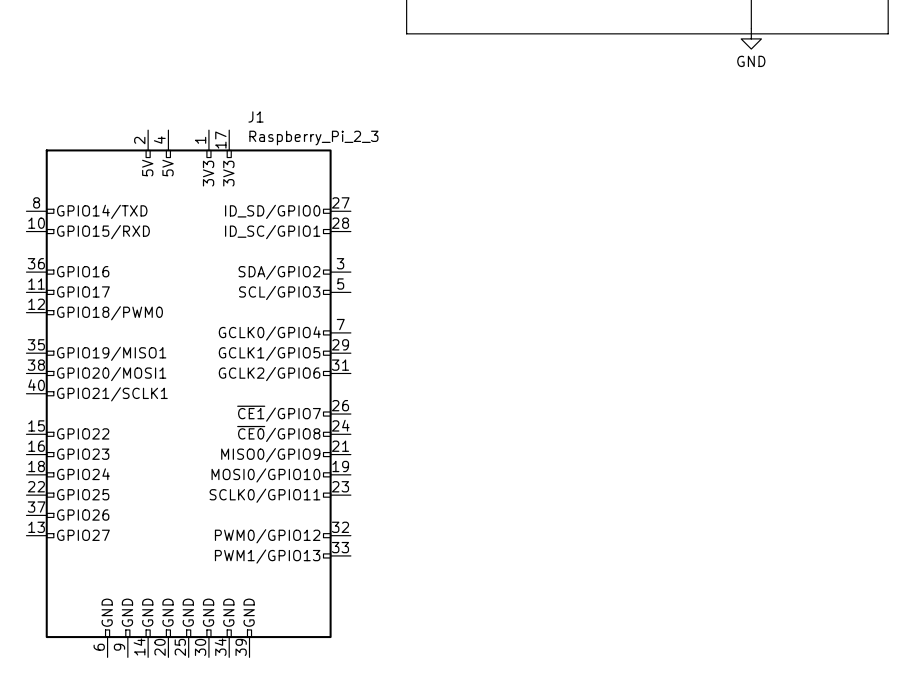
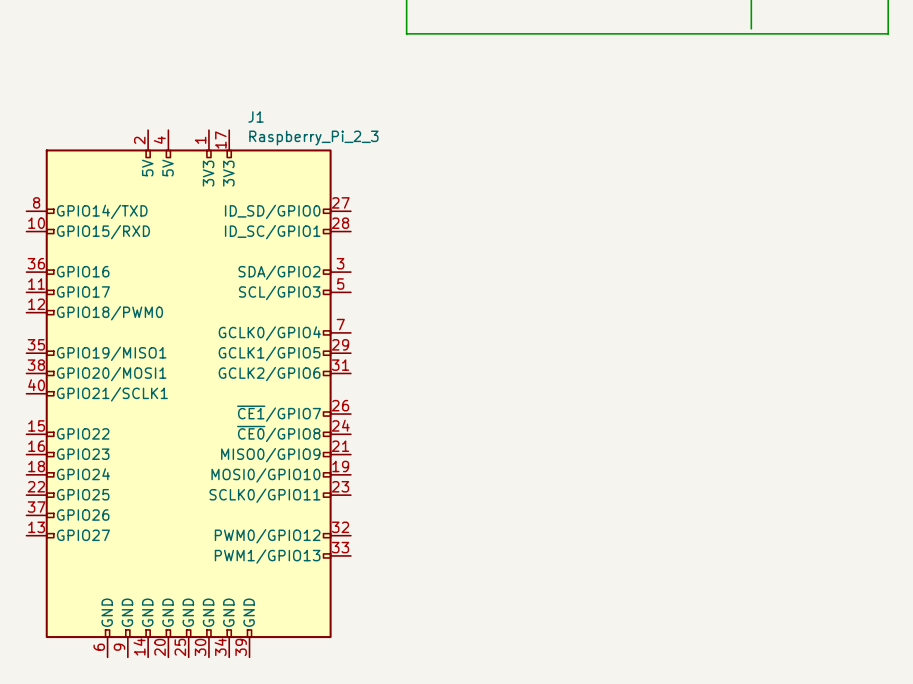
power symbol: GND (751, 38) -> none

